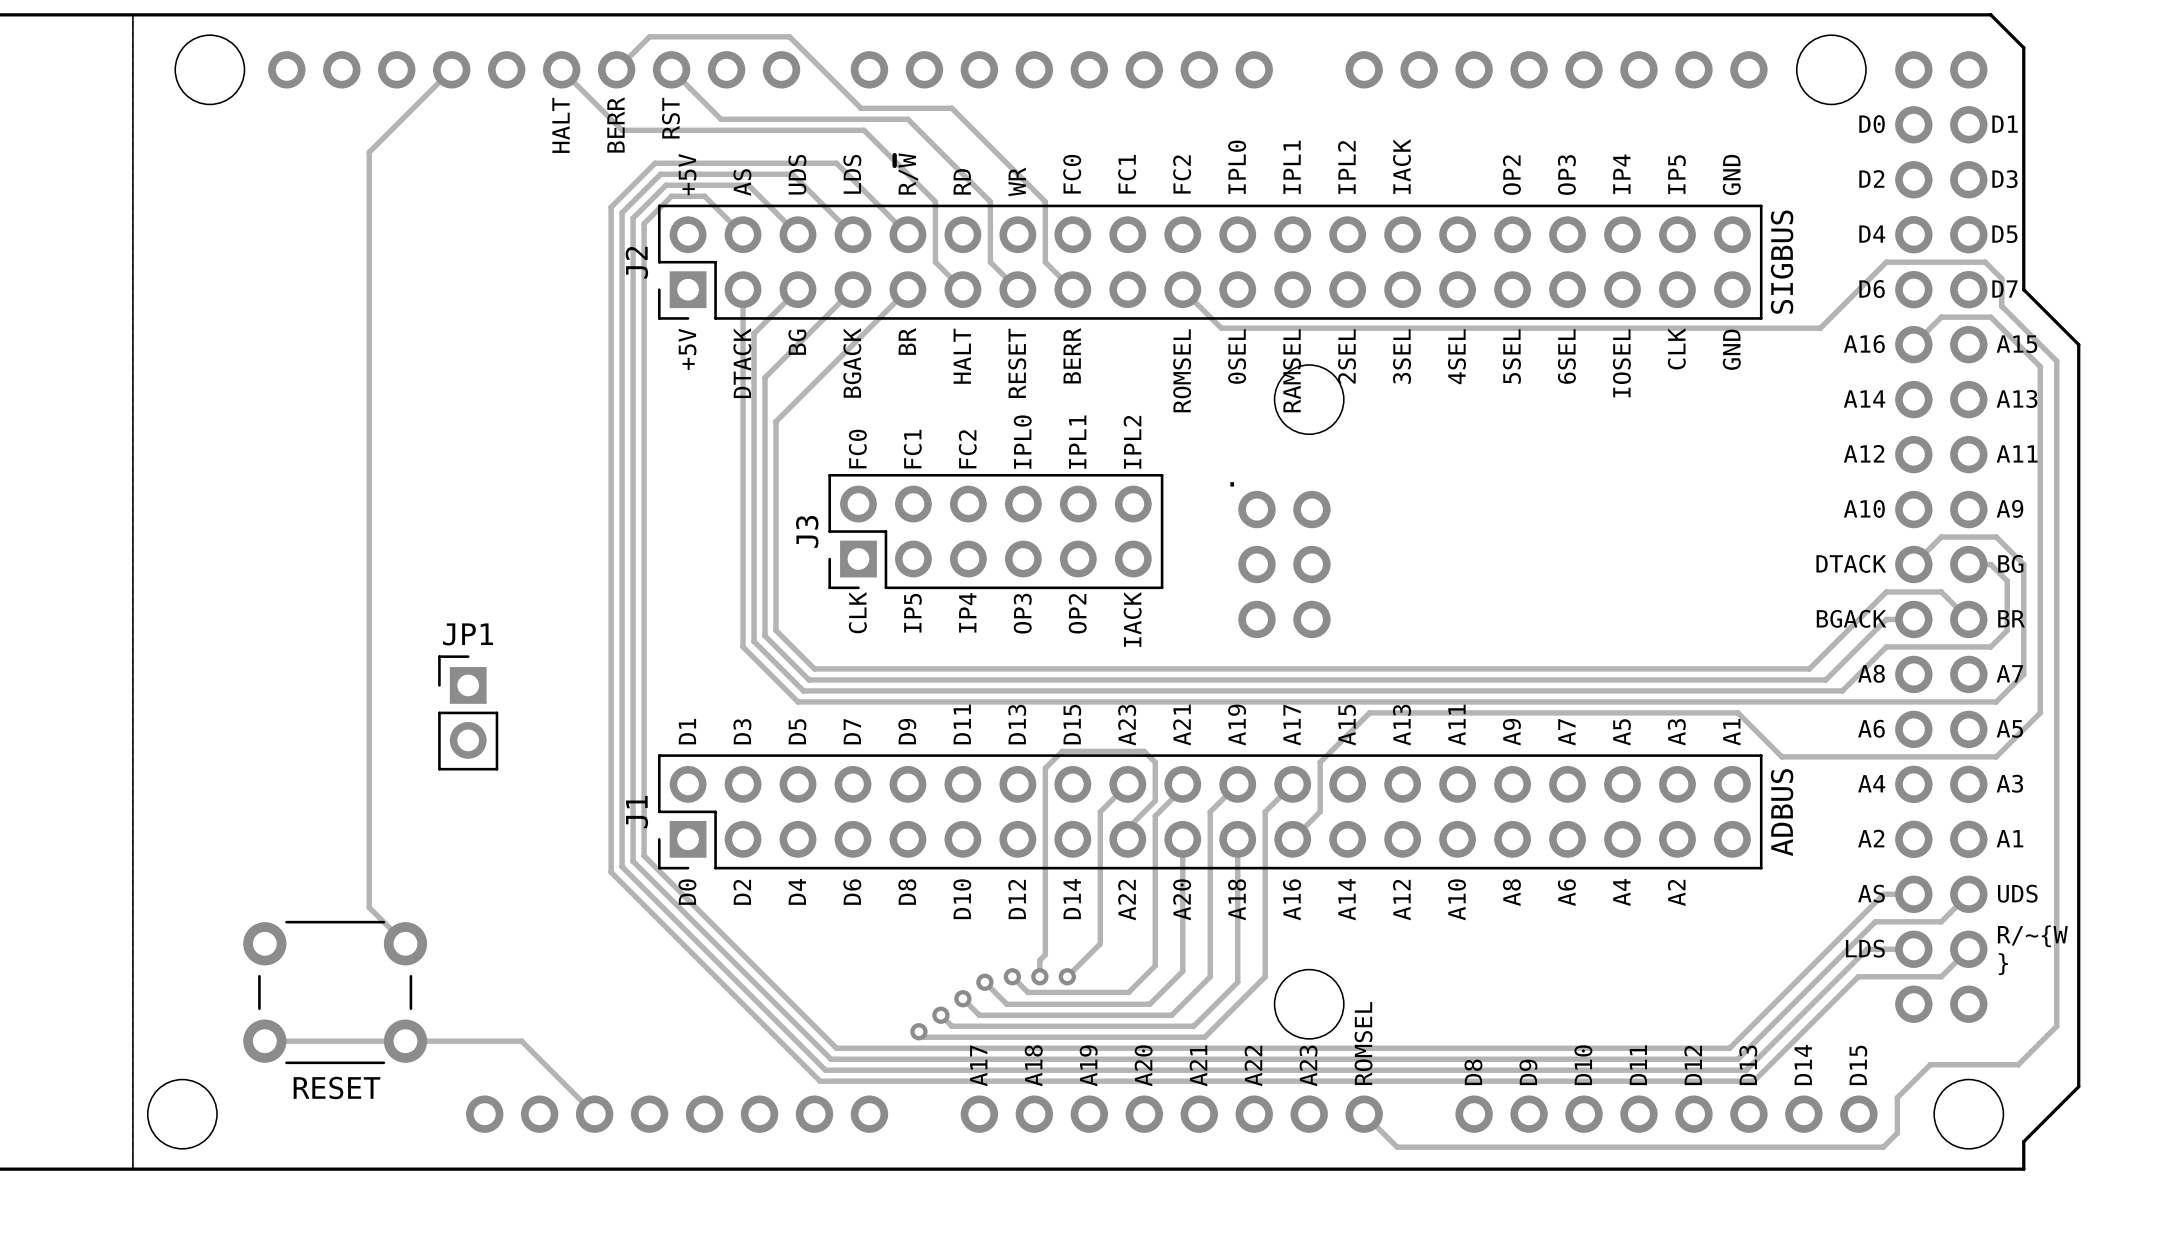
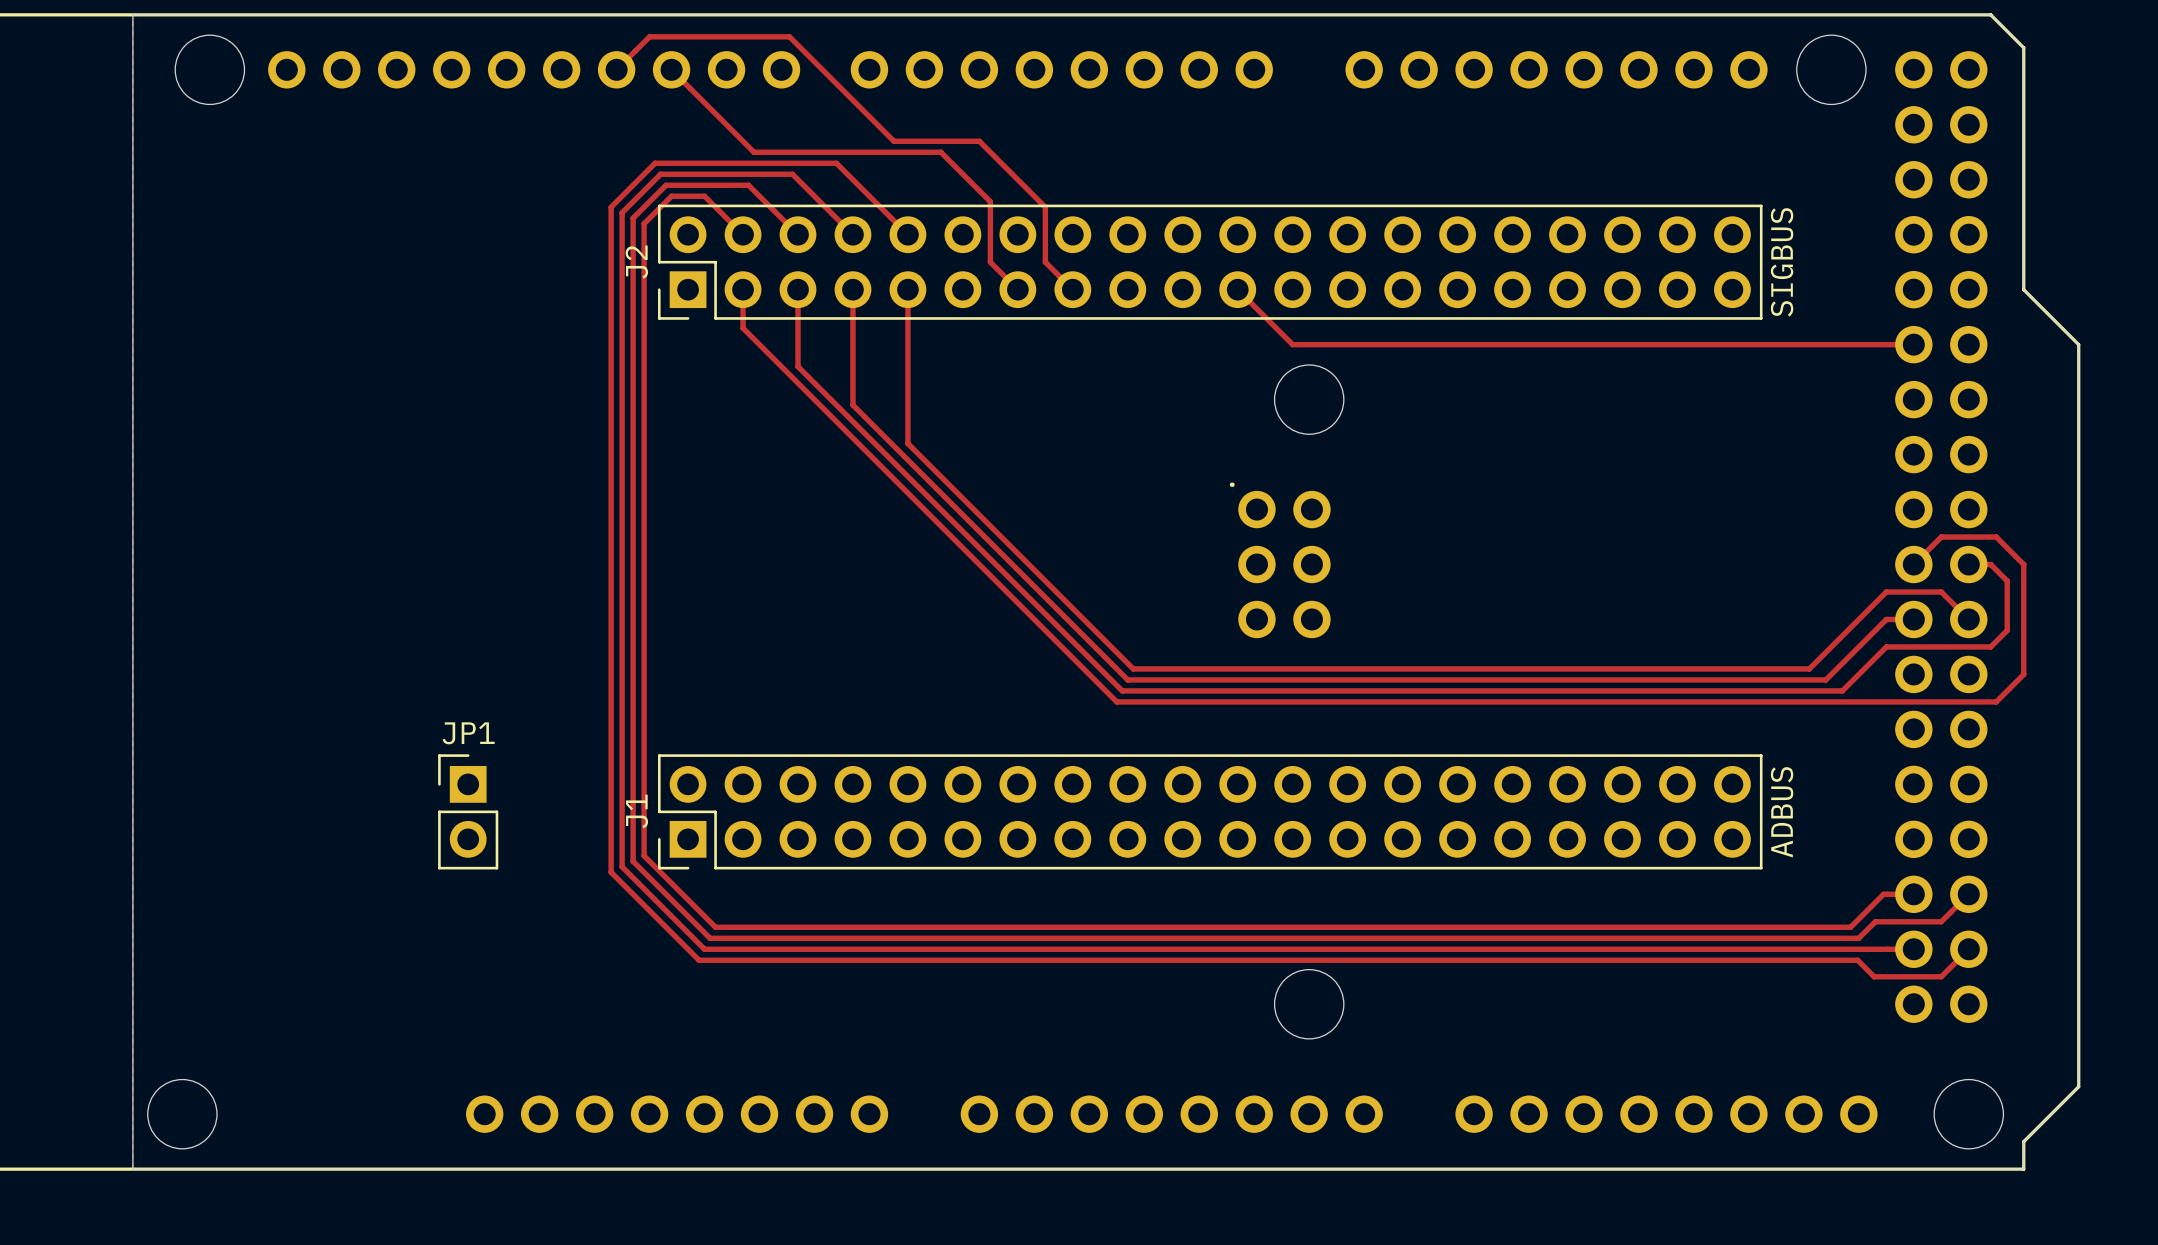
track: (451, 69) (369, 152) (369, 907) (405, 943) -> none
track: (561, 69) (622, 130) (863, 130) (935, 201) (935, 262) (962, 289) -> none
track: (861, 108) (951, 108) (1045, 201) (1045, 207) -> (861, 108) (893, 141) (979, 141) (1045, 207)
text: RST (670, 118) -> none
track: (721, 119) (907, 119) (940, 152) -> (721, 119) (754, 152) (940, 152)
text: BERR (615, 124) -> none
text: D0 (1872, 124) -> none
text: D1 (2005, 124) -> none
text: HALT (561, 125) -> none
text: IACK (1402, 166) -> none
text: IPL0 (1237, 167) -> none
text: IPL1 (1292, 167) -> none
text: IPL2 (1346, 167) -> none
text: R/~{W} (906, 173) -> none
text: +5V (687, 174) -> none
text: UDS (797, 174) -> none
text: LDS (852, 174) -> none
text: FC0 (1072, 174) -> none
text: FC1 (1127, 174) -> none
text: FC2 (1182, 174) -> none
text: IP4 (1621, 174) -> none
text: IP5 (1676, 174) -> none
text: GND (1731, 174) -> none
text: OP2 (1511, 175) -> none
text: OP3 (1566, 175) -> none
text: D2 (1871, 178) -> none
text: D3 (2004, 179) -> none
text: RD (962, 181) -> none
text: WR (1017, 181) -> none
text: AS (742, 182) -> none
text: D4 (1872, 234) -> none
text: D5 (2004, 234) -> none
track: (798, 289) (754, 333) (754, 641) (803, 690) (1122, 690) -> (798, 289) (798, 366) (1122, 690)
track: (852, 289) (765, 377) (765, 635) (809, 679) (1127, 679) -> (852, 289) (852, 405) (1127, 679)
track: (907, 289) (776, 421) (776, 630) (814, 668) (1133, 668) -> (907, 289) (907, 443) (1133, 668)
track: (1182, 289) (1221, 328) (1820, 328) (1886, 262) (1985, 262) (2001, 278) (2001, 306) (2056, 361) (2056, 1026) (2018, 1064) (1930, 1064) (1897, 1097) (1897, 1133) (1883, 1147) (1397, 1147) (1364, 1114) -> none
text: D6 (1872, 289) -> none
text: D7 (2004, 289) -> none
track: (743, 328) (743, 646) (798, 701) (1116, 701) -> (743, 328) (1116, 701)
text: BR (907, 341) -> none
text: BG (797, 342) -> none
text: A16 (1864, 344) -> none
track: (1913, 344) (1941, 317) (1990, 317) (2040, 366) (2040, 712) (1996, 756) (1781, 756) (1737, 712) (1369, 712) (1320, 762) (1320, 811) (1292, 839) -> (1913, 344) (1292, 344) (1237, 289)
text: A15 (2016, 344) -> none
text: CLK (1676, 348) -> none
text: +5V (687, 349) -> none
text: GND (1731, 349) -> none
text: BERR (1072, 355) -> none
text: HALT (962, 356) -> none
text: 0SEL (1237, 356) -> none
text: 2SEL (1347, 356) -> none
text: 3SEL (1402, 356) -> none
text: 4SEL (1456, 356) -> none
text: 5SEL (1511, 356) -> none
text: 6SEL (1566, 356) -> none
text: BGACK (852, 362) -> none
text: DTACK (742, 363) -> none
text: RESET (1017, 363) -> none
text: IOSEL (1621, 363) -> none
text: ROMSEL (1182, 370) -> none
text: RAMSEL (1292, 370) -> none
text: A14 (1864, 398) -> none
text: A13 (2017, 398) -> none
text: IPL0 (1022, 442) -> none
text: IPL1 (1077, 442) -> none
text: IPL2 (1132, 442) -> none
text: FC0 (857, 449) -> none
text: FC1 (912, 449) -> none
text: FC2 (967, 449) -> none
text: A12 (1864, 453) -> none
text: A11 (2017, 453) -> none
text: A10 (1864, 508) -> none
text: A9 (2009, 508) -> none
J3: (995, 531) -> none
text: DTACK (1851, 563) -> none
text: BG (2010, 563) -> none
text: CLK (857, 612) -> none
text: IP4 (967, 612) -> none
text: IP5 (912, 613) -> none
text: OP3 (1022, 613) -> none
text: OP2 (1077, 613) -> none
text: BGACK (1851, 618) -> none
text: BR (2011, 618) -> none
text: IACK (1132, 619) -> none
text: A8 (1871, 673) -> none
text: A7 (2009, 673) -> none
JP1 position: (468, 712) -> (468, 811)
text: D11 (962, 724) -> none
text: D13 (1017, 724) -> none
text: D15 (1072, 724) -> none
text: A23 (1127, 725) -> none
text: A21 (1181, 725) -> none
text: A19 (1237, 725) -> none
text: A17 (1292, 725) -> none
text: A15 (1347, 725) -> none
text: A13 (1402, 725) -> none
text: A11 (1456, 725) -> none
text: A6 (1871, 728) -> none
text: A5 (2009, 728) -> none
text: D1 (687, 731) -> none
text: D3 (742, 731) -> none
text: D5 (797, 731) -> none
text: D7 (852, 731) -> none
text: D9 (907, 731) -> none
text: A9 (1511, 732) -> none
text: A7 (1566, 732) -> none
text: A5 (1622, 732) -> none
text: A3 (1676, 732) -> none
text: A1 (1731, 732) -> none
text: A4 (1871, 783) -> none
text: A3 (2009, 783) -> none
track: (1127, 784) (1100, 811) (1100, 943) (1067, 976) -> none
track: (1182, 784) (1182, 788) (1155, 816) (1155, 965) (1128, 992) (1028, 992) (1012, 976) -> none
track: (1237, 784) (1210, 811) (1210, 976) (1171, 1015) (979, 1015) (962, 998) -> none
track: (1292, 784) (1265, 811) (1265, 976) (1204, 1037) (924, 1037) (918, 1031) -> none
text: A2 (1871, 838) -> none
text: A1 (2009, 838) -> none
track: (1127, 839) (1127, 828) (1155, 800) (1155, 762) (1144, 751) (1062, 751) (1045, 768) (1045, 954) (1039, 960) (1039, 976) -> none
track: (1182, 839) (1182, 971) (1149, 1004) (1006, 1004) (984, 982) -> none
track: (1237, 839) (1237, 982) (1193, 1026) (951, 1026) (940, 1015) -> none
text: D4 (797, 891) -> none
text: D0 (687, 892) -> none
text: D2 (742, 892) -> none
text: D6 (852, 892) -> none
text: D8 (907, 892) -> none
text: A8 (1511, 892) -> none
text: A6 (1566, 892) -> none
text: A4 (1621, 892) -> none
text: A2 (1676, 892) -> none
text: AS (1871, 893) -> none
text: UDS (2017, 893) -> none
text: D10 (962, 899) -> none
text: D12 (1017, 899) -> none
text: D14 (1072, 899) -> none
text: A20 (1182, 899) -> none
text: A18 (1237, 899) -> none
text: A16 (1292, 899) -> none
text: A14 (1347, 899) -> none
text: A10 (1456, 899) -> none
text: A22 (1127, 900) -> none
text: A12 (1401, 900) -> none
track: (715, 927) (836, 1048) (1729, 1048) (1850, 927) -> (715, 927) (1850, 927)
text: R/~{W (2032, 936) -> none
track: (710, 938) (830, 1059) (1737, 1059) (1858, 938) -> (710, 938) (1858, 938)
text: LDS (1865, 948) -> none
track: (704, 949) (825, 1070) (1746, 1070) (1867, 949) -> (704, 949) (1867, 949)
track: (699, 960) (819, 1081) (1753, 1081) (1858, 976) (1874, 976) -> (699, 960) (1857, 960) (1874, 976)
text: } (2003, 964) -> none
via: (1012, 976) -> none
via: (1039, 976) -> none
via: (1067, 976) -> none
via: (984, 982) -> none
part: RESET (335, 992) -> none
via: (962, 998) -> none
via: (940, 1015) -> none
via: (918, 1031) -> none
track: (264, 1041) (521, 1041) (594, 1114) -> none
text: ROMSEL (1363, 1043) -> none
text: A17 (978, 1065) -> none
text: A18 (1033, 1065) -> none
text: A19 (1088, 1065) -> none
text: A20 (1143, 1065) -> none
text: A21 (1198, 1065) -> none
text: A23 (1308, 1065) -> none
text: D10 (1583, 1065) -> none
text: D11 (1638, 1065) -> none
text: D12 (1693, 1065) -> none
text: D13 (1748, 1065) -> none
text: D14 (1803, 1065) -> none
text: D15 (1858, 1065) -> none
text: A22 (1253, 1066) -> none
text: D8 (1473, 1072) -> none
text: D9 (1528, 1072) -> none

